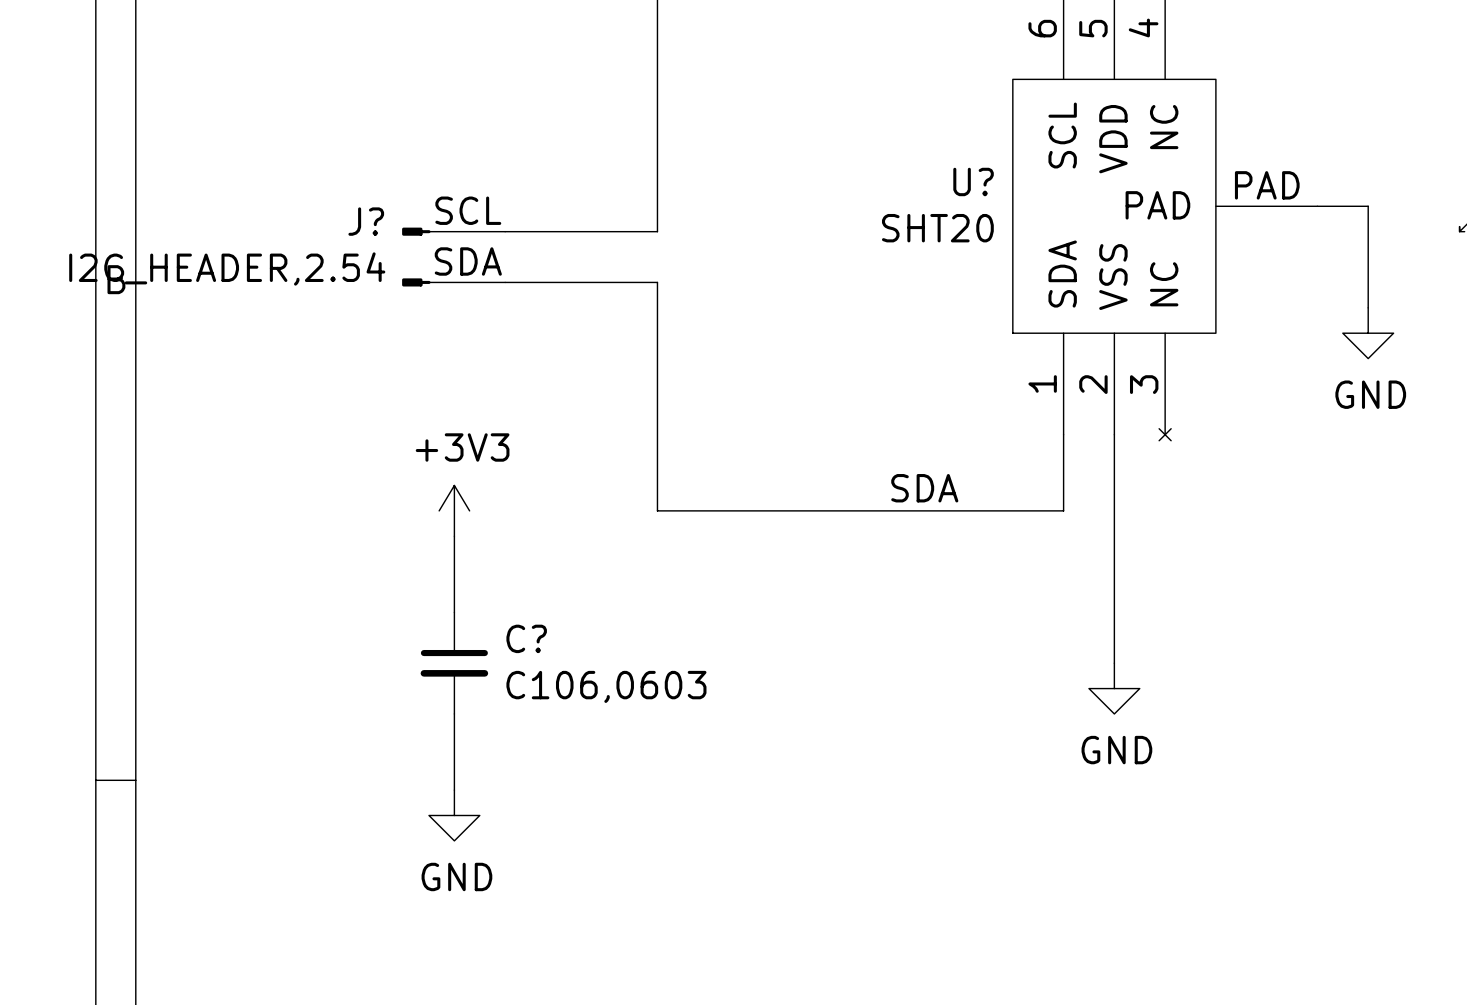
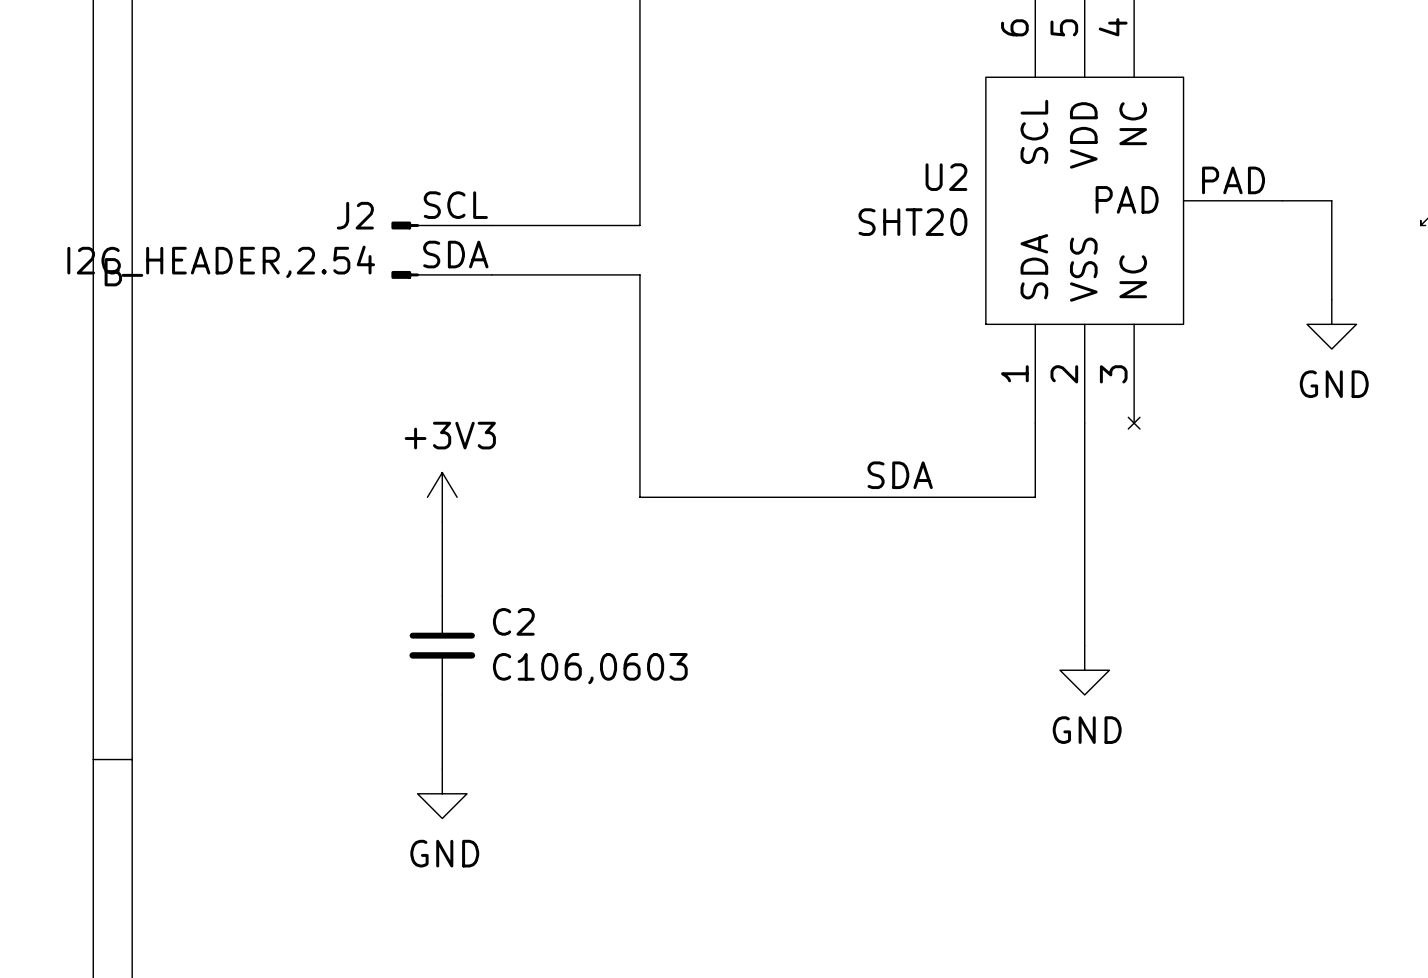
U? name: U? (973, 181) -> U2 (946, 177)
J? name: J? (366, 221) -> J2 (355, 215)
C? name: C? (526, 638) -> C2 (513, 621)

